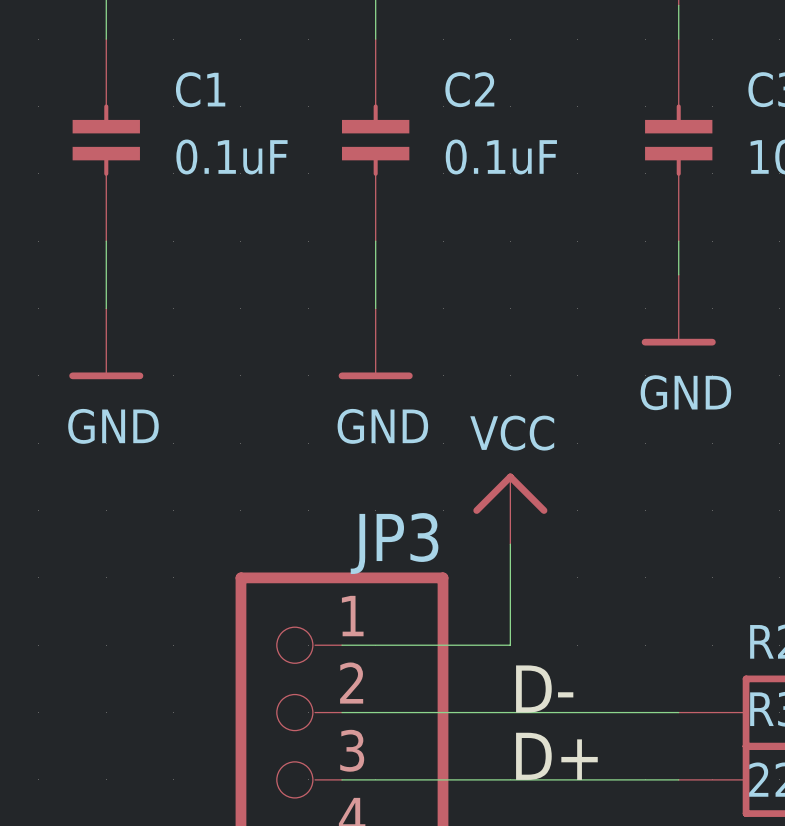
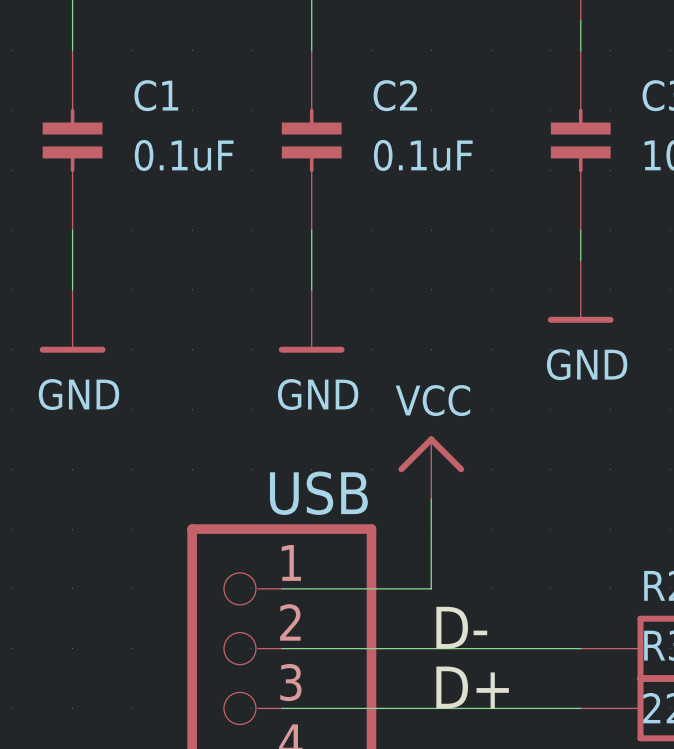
JP3 name: JP3 (394, 543) -> USB (318, 493)

